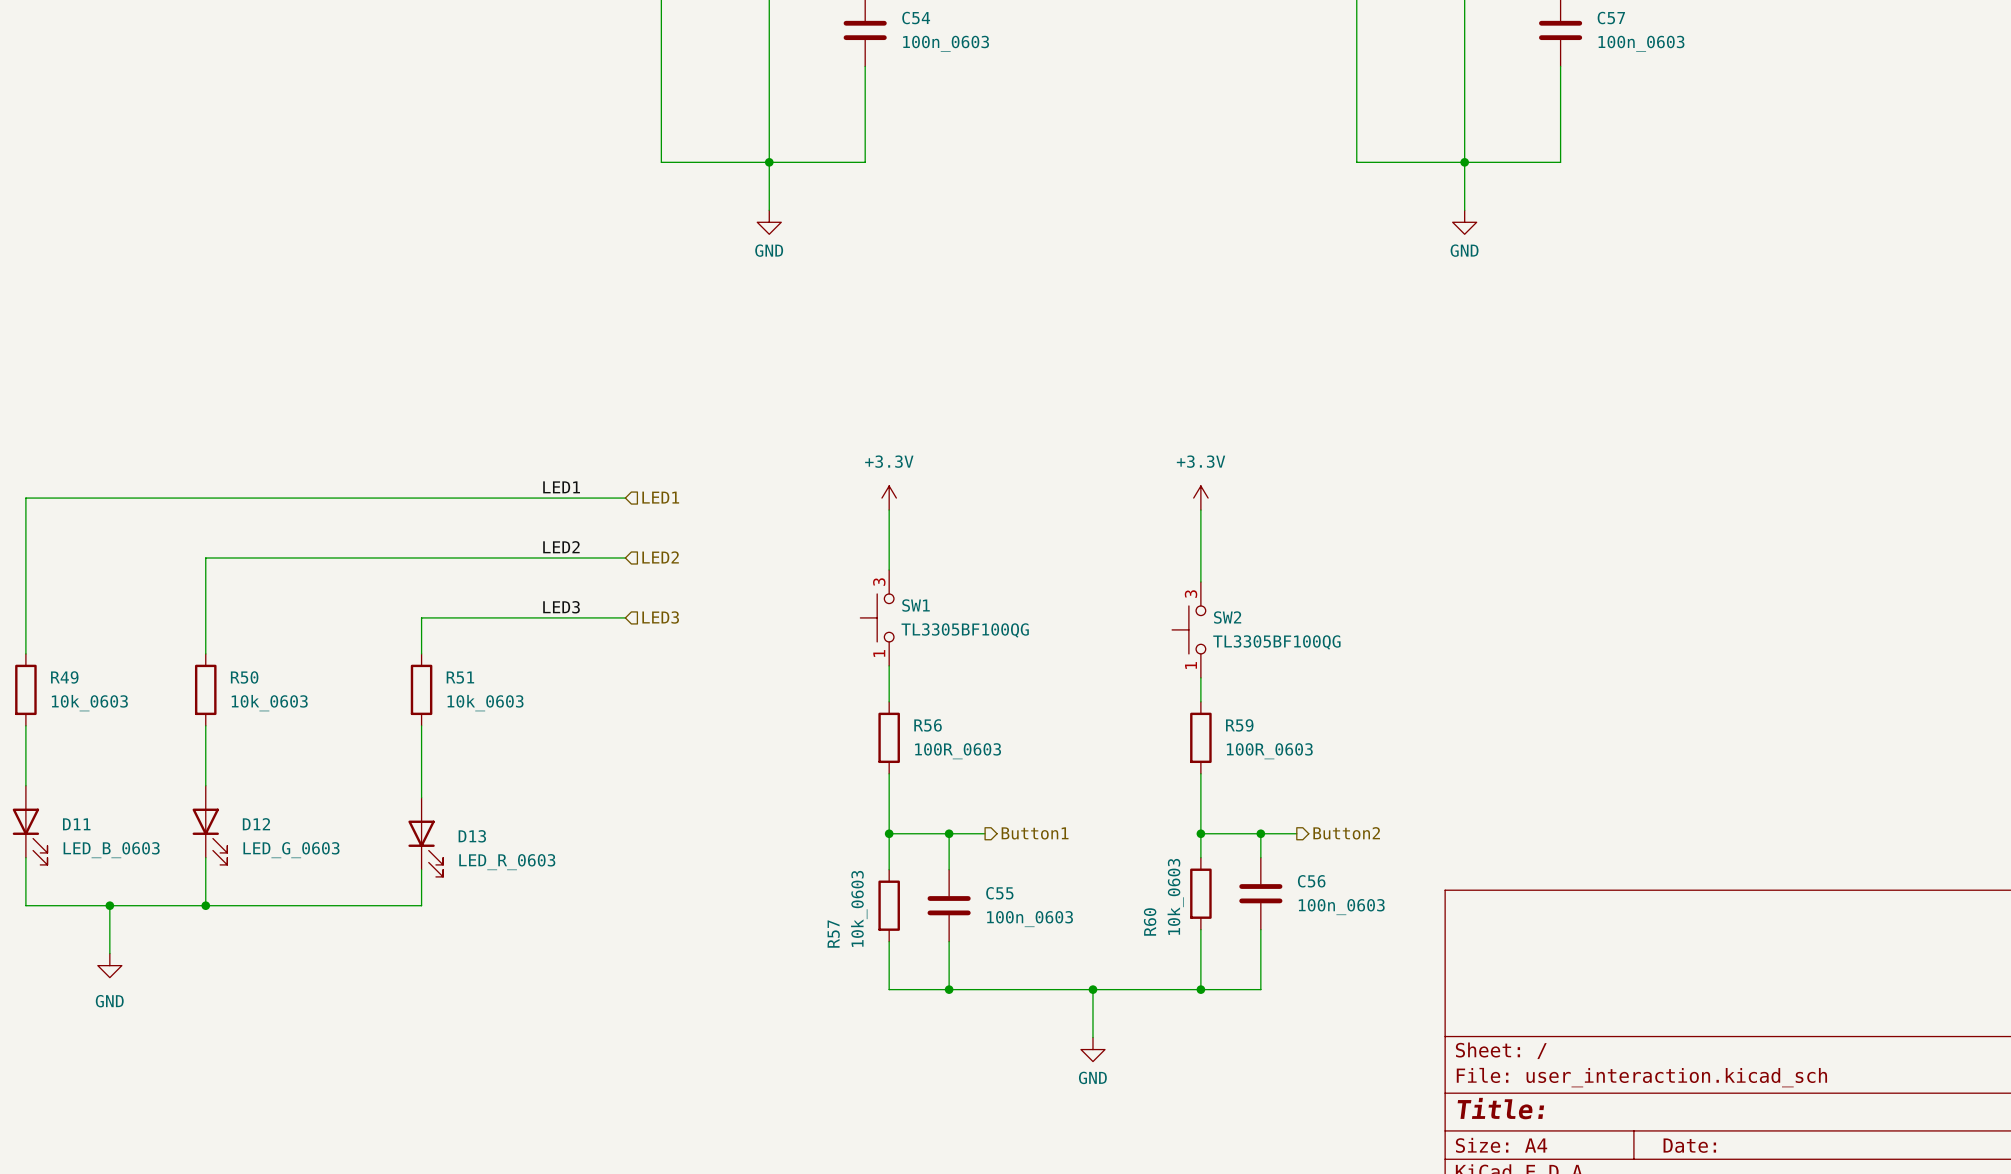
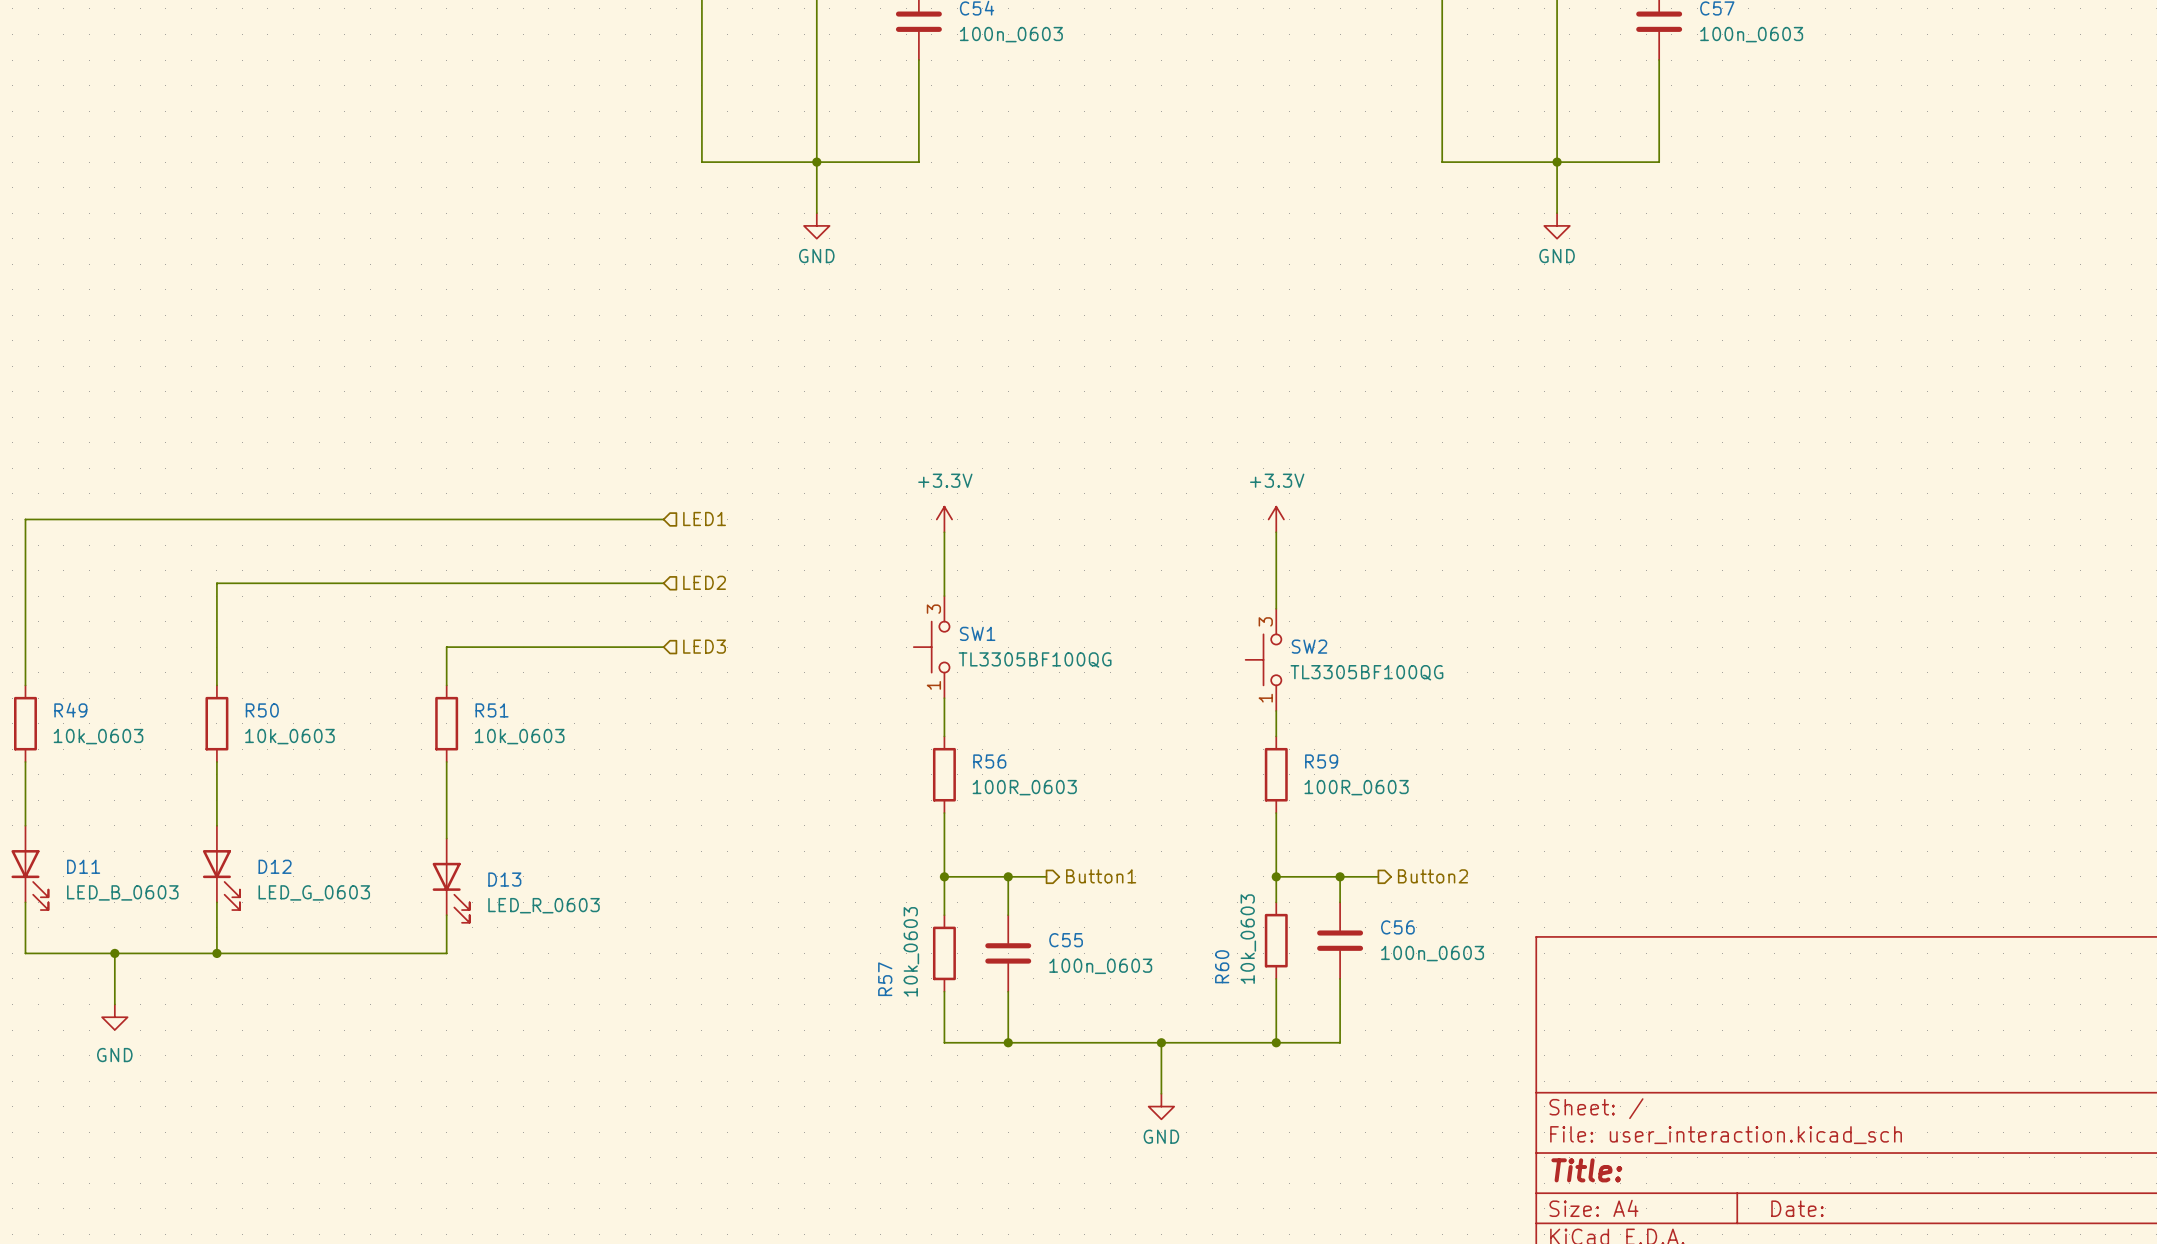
label: LED1 (561, 487) -> none
label: LED2 (561, 547) -> none
label: LED3 (561, 607) -> none

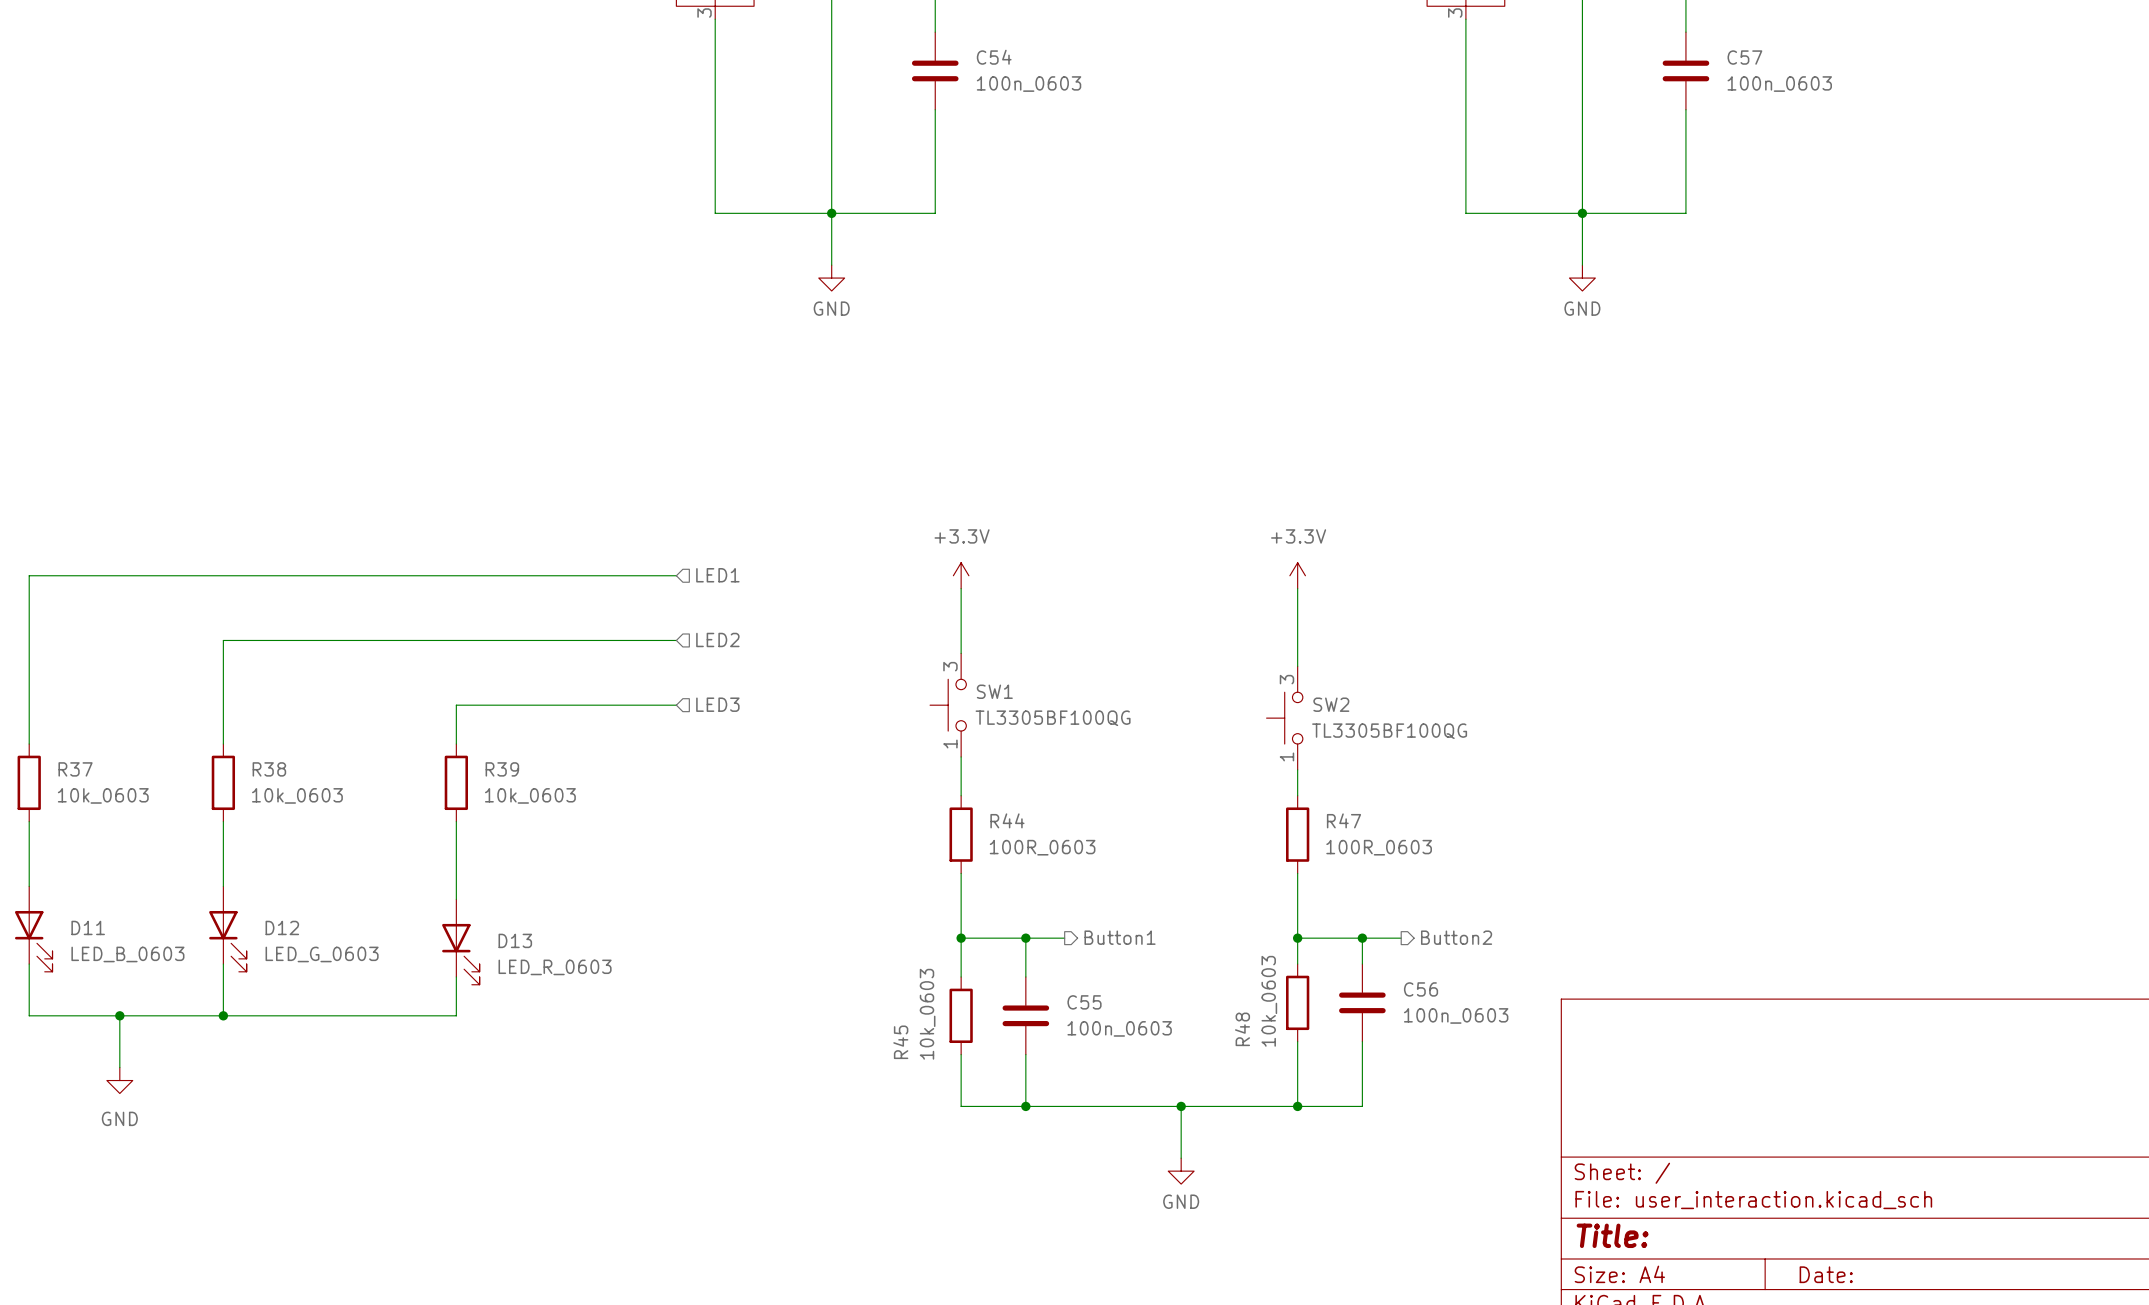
R49 name: R49 (70, 710) -> R37 (75, 769)
R50 name: R50 (262, 710) -> R38 (269, 769)
R51 name: R51 (492, 710) -> R39 (502, 769)
R56 name: R56 (989, 761) -> R44 (1007, 820)
R59 name: R59 (1321, 761) -> R47 (1343, 820)
R60 name: R60 (1222, 966) -> R48 (1242, 1029)
R57 name: R57 (885, 979) -> R45 (900, 1042)

